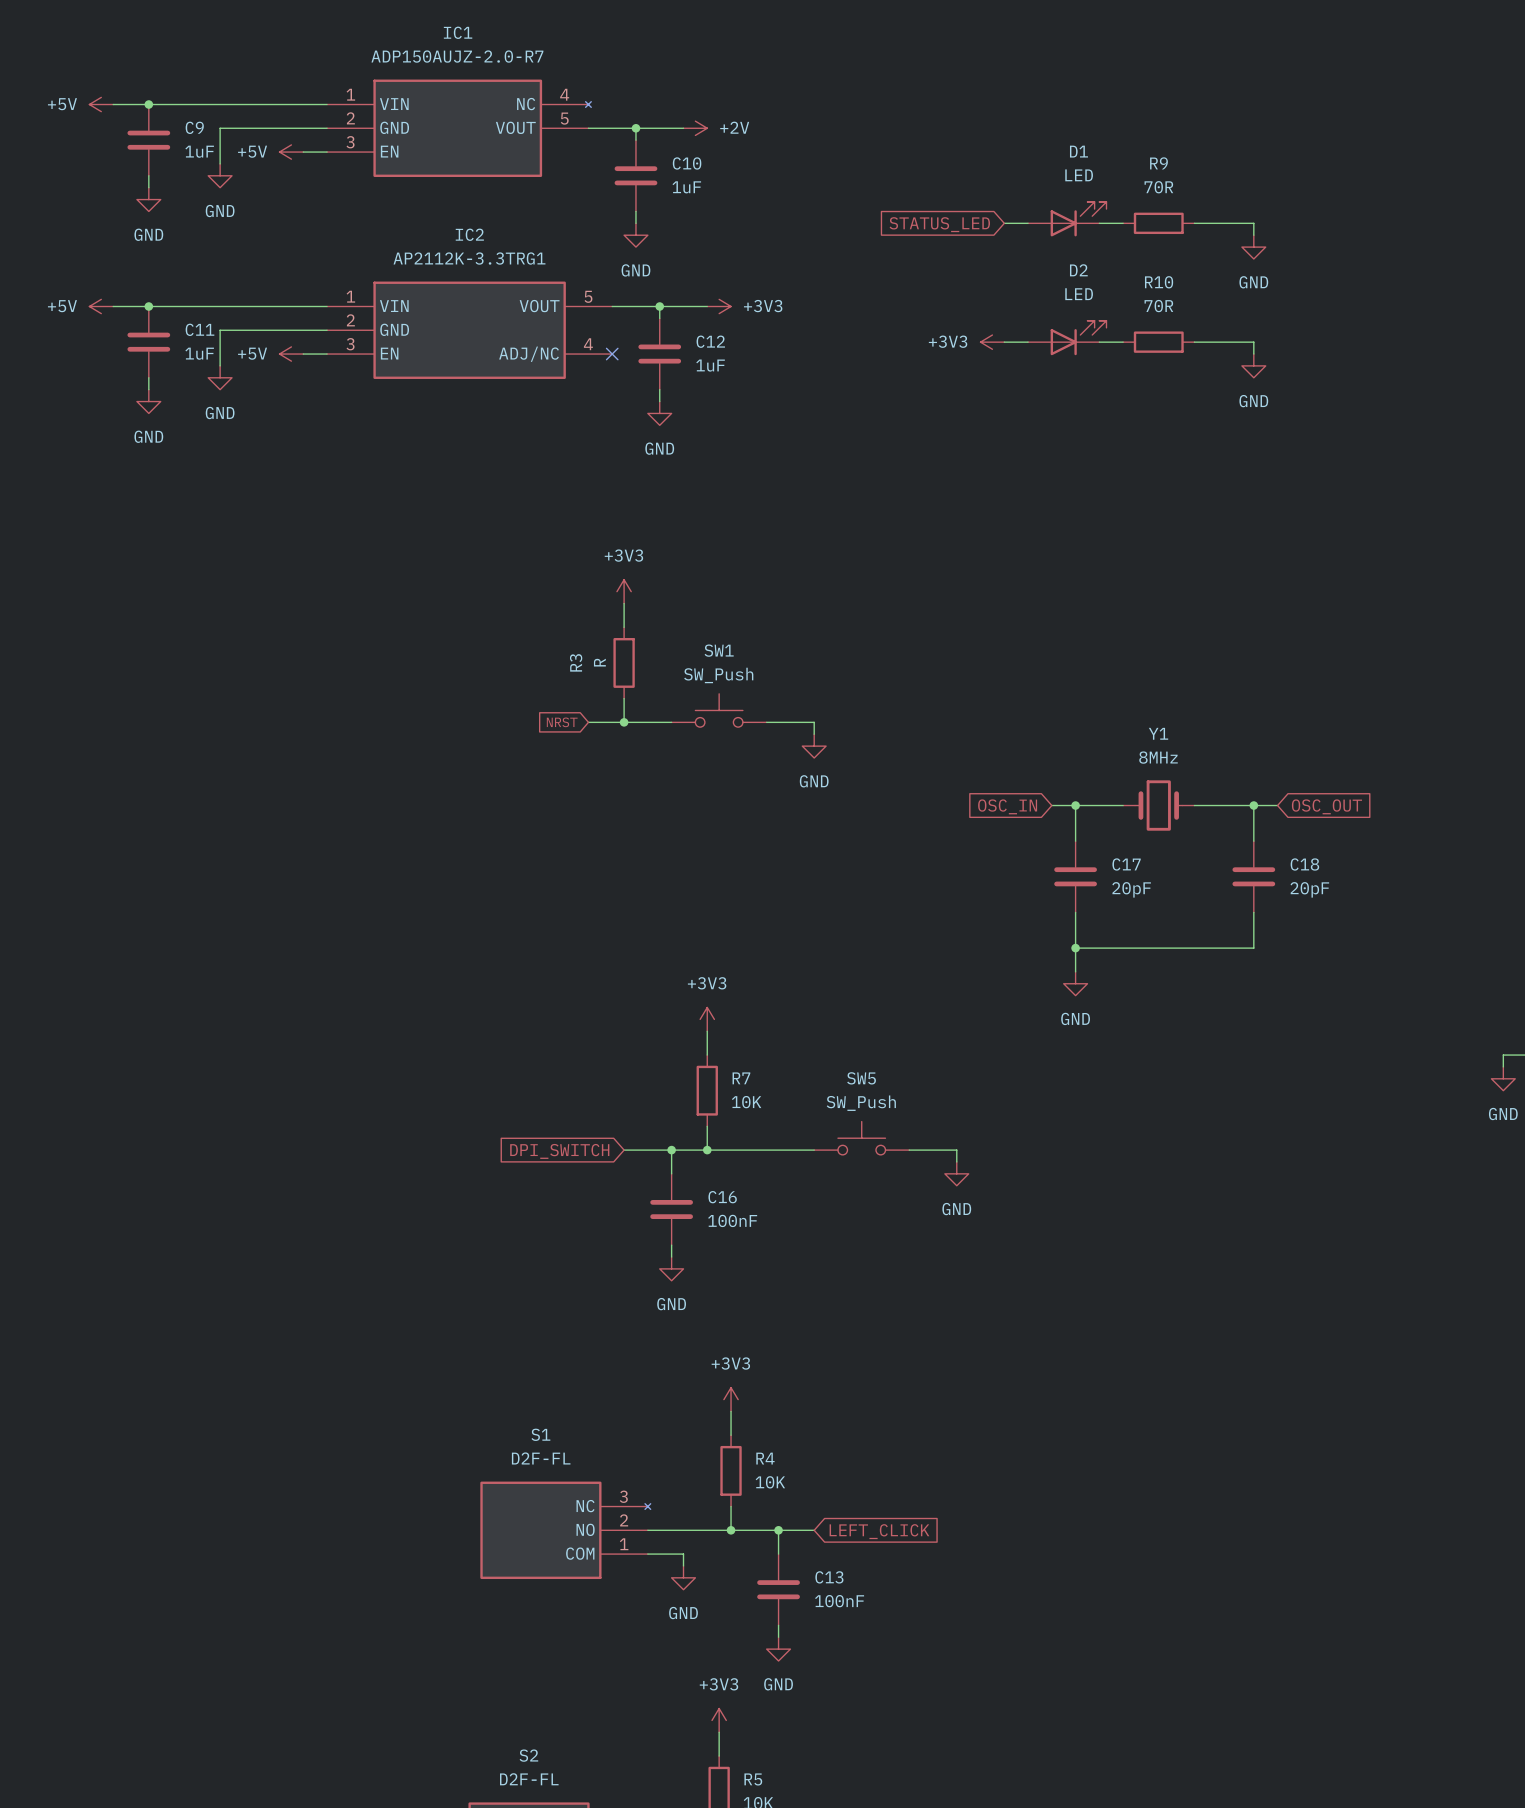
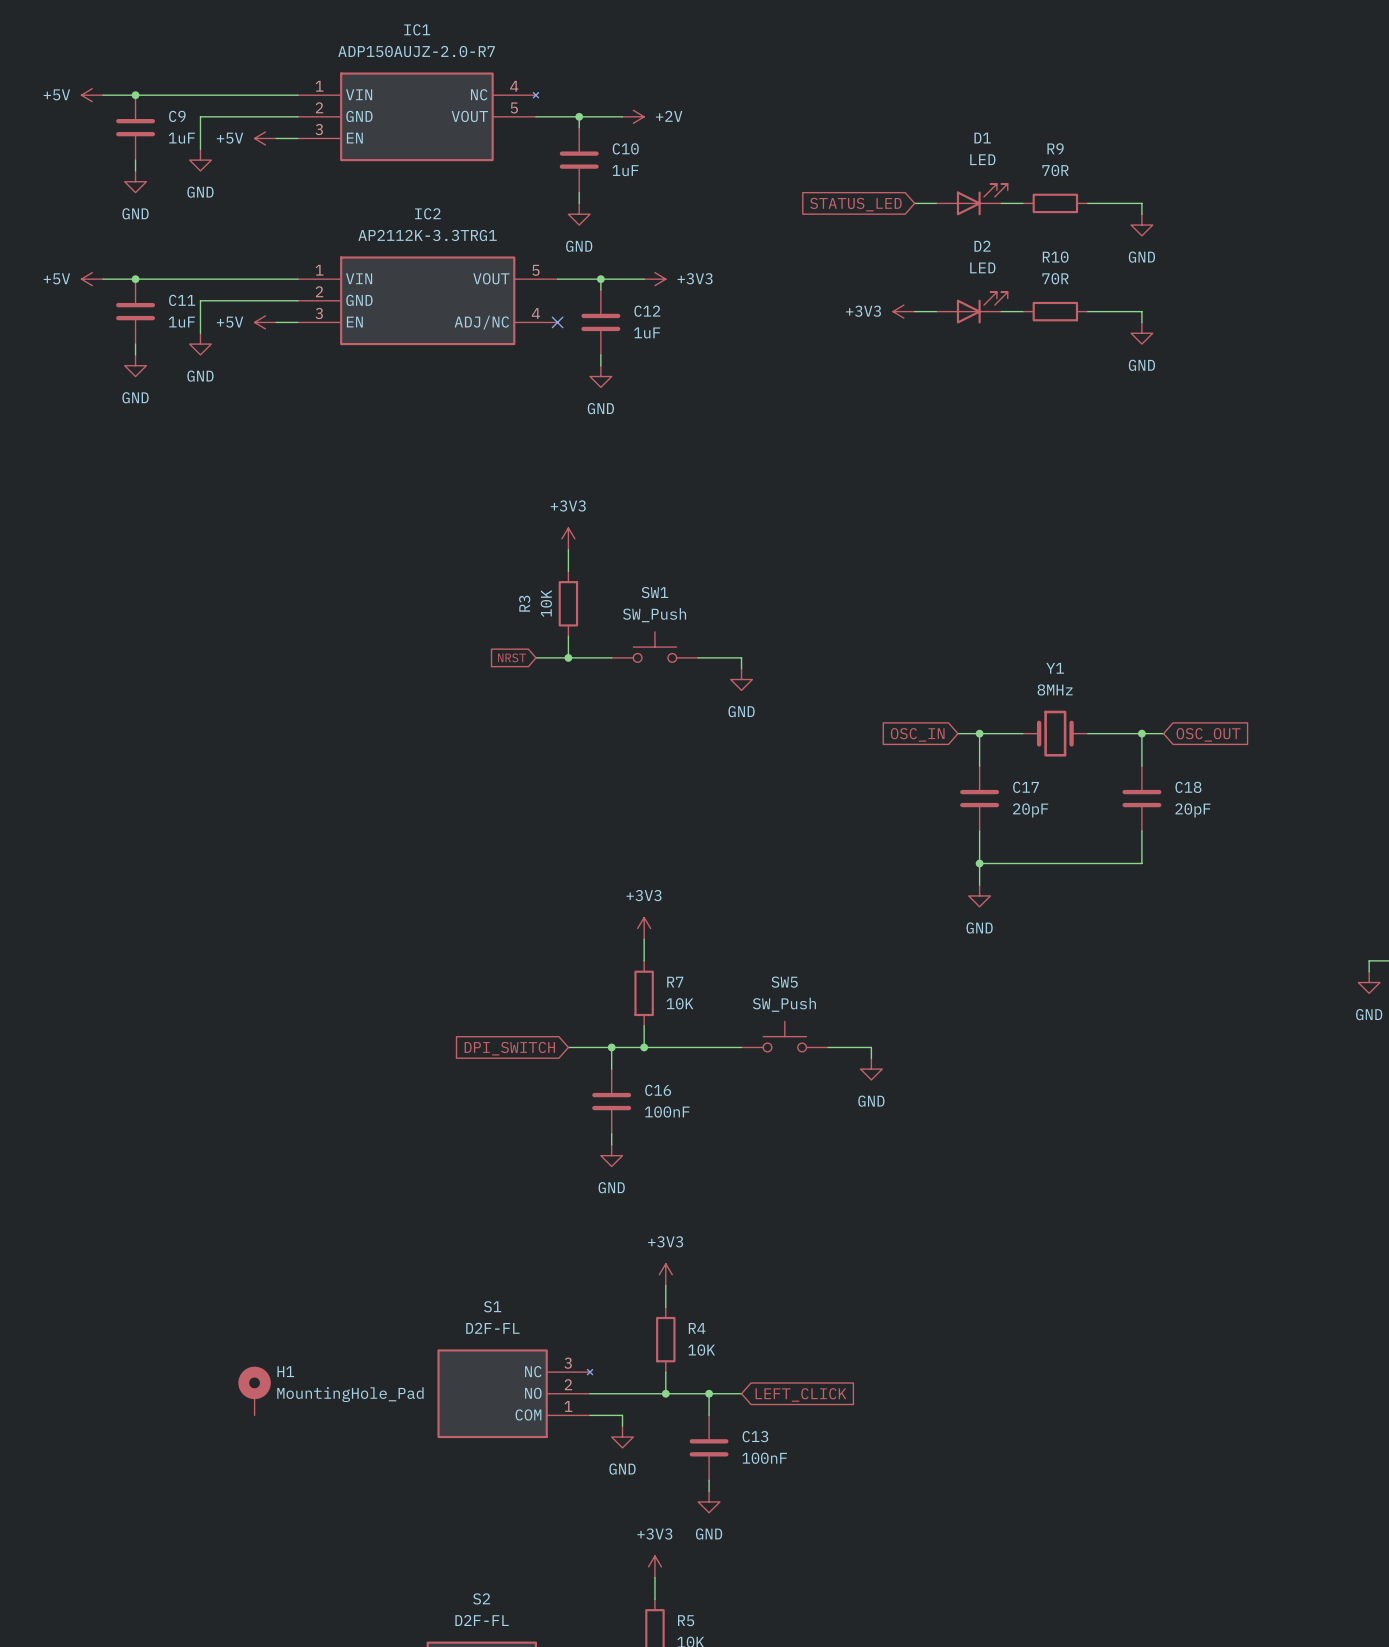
R3 value: R (599, 662) -> 10K (546, 603)
H1: none -> MountingHole_Pad (254, 1391)

